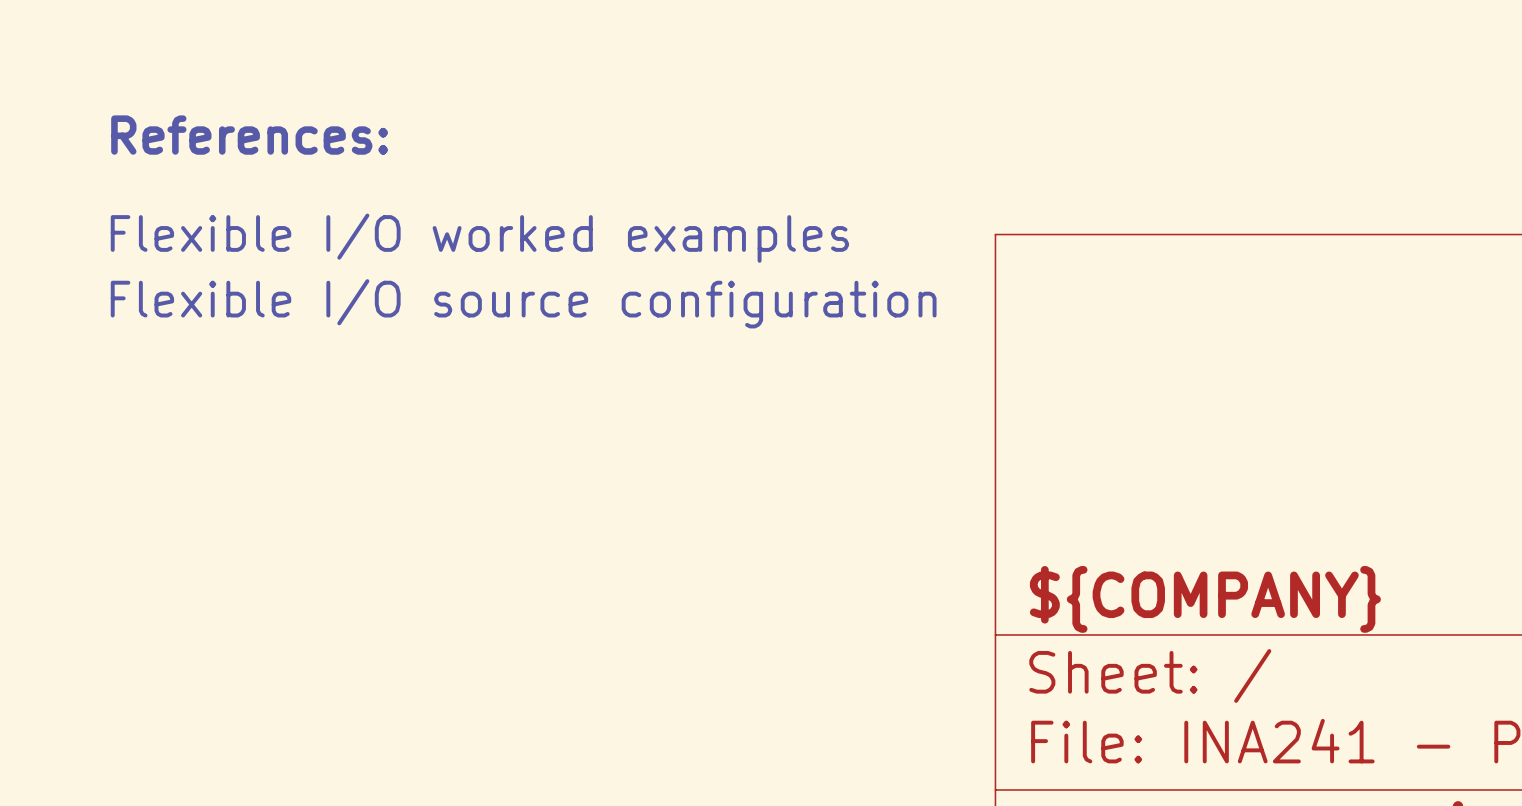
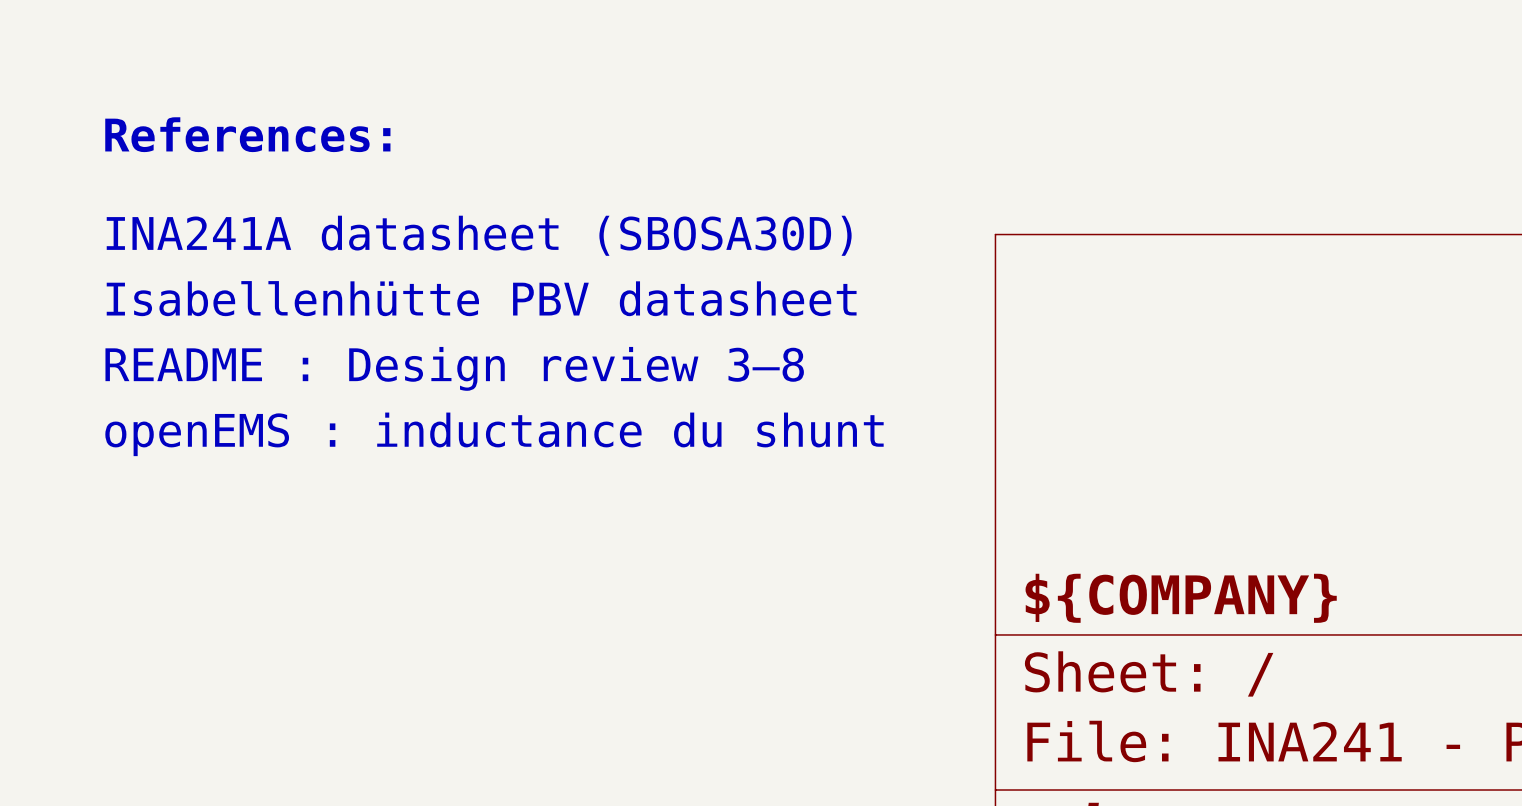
text: Flexible I/O worked examples (479, 238) -> INA241A datasheet (SBOSA30D) (479, 235)
text: Flexible I/O source configuration (523, 303) -> Isabellenhütte PBV datasheet (481, 298)
text: none -> README : Design review 3–8 (454, 368)
text: none -> openEMS : inductance du shunt (494, 434)

